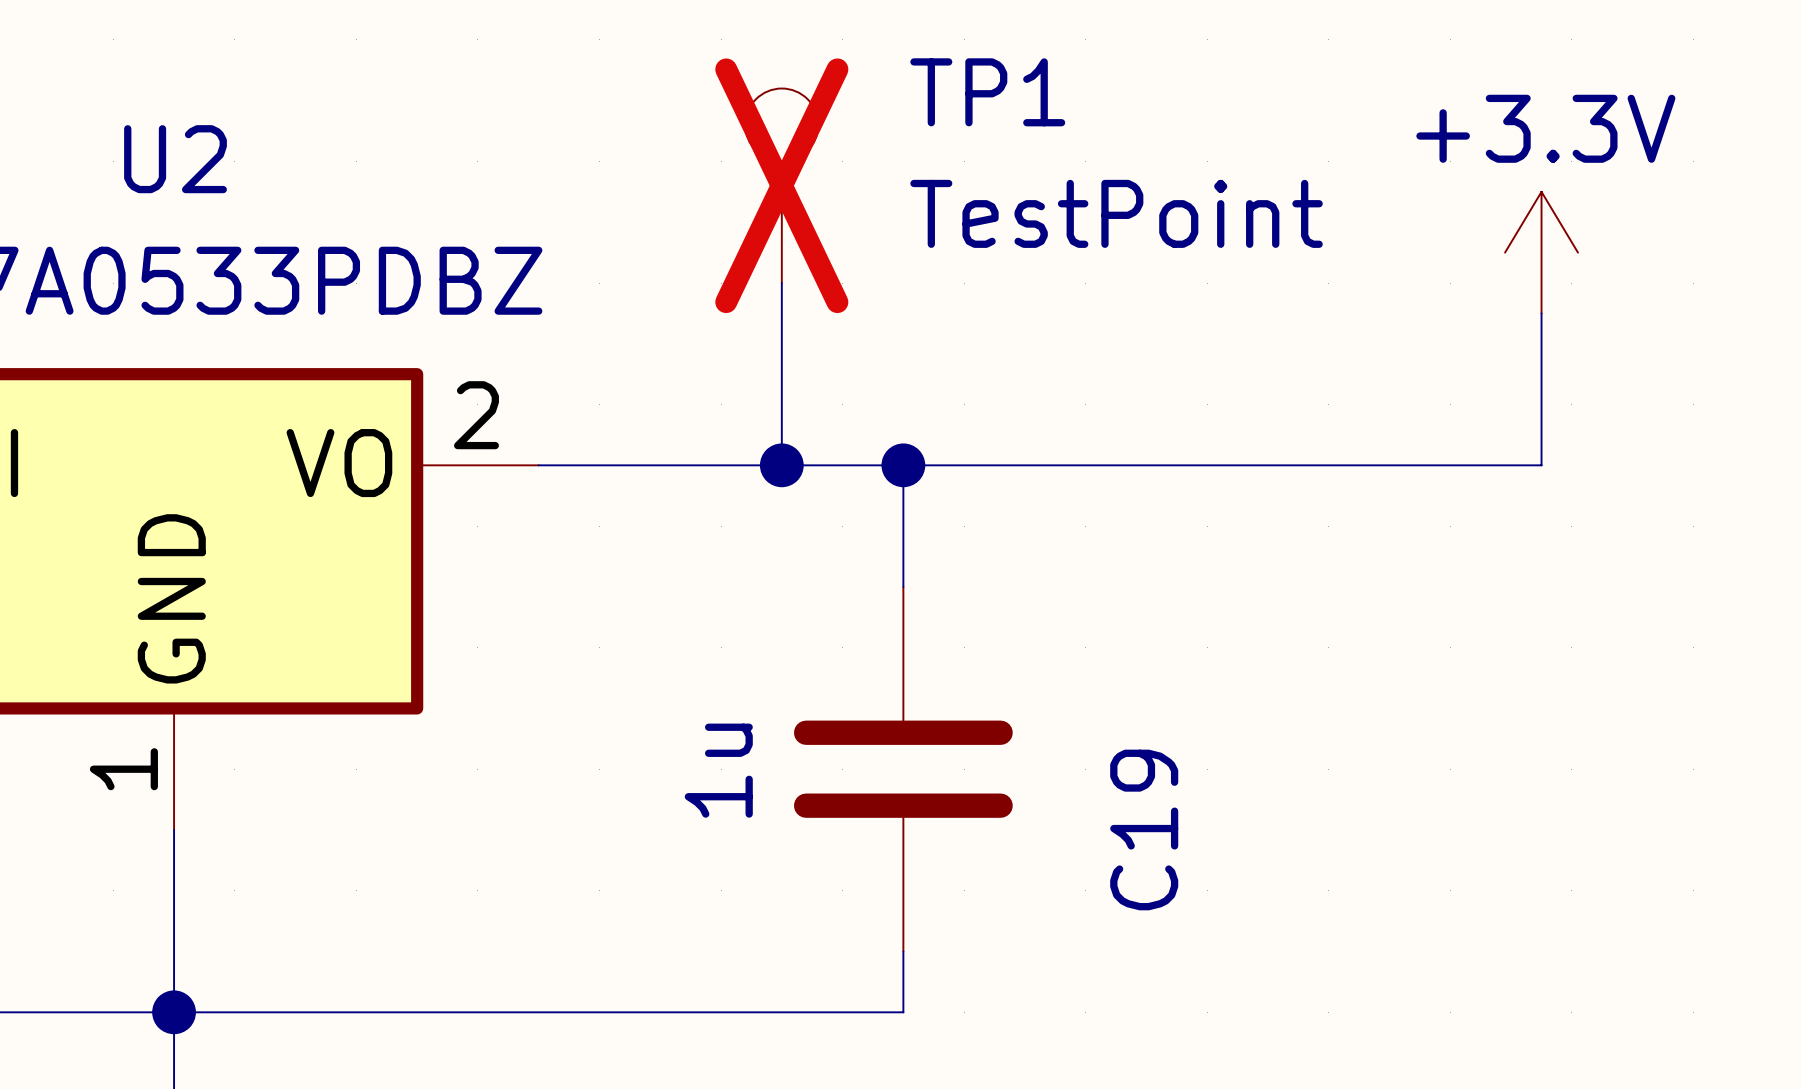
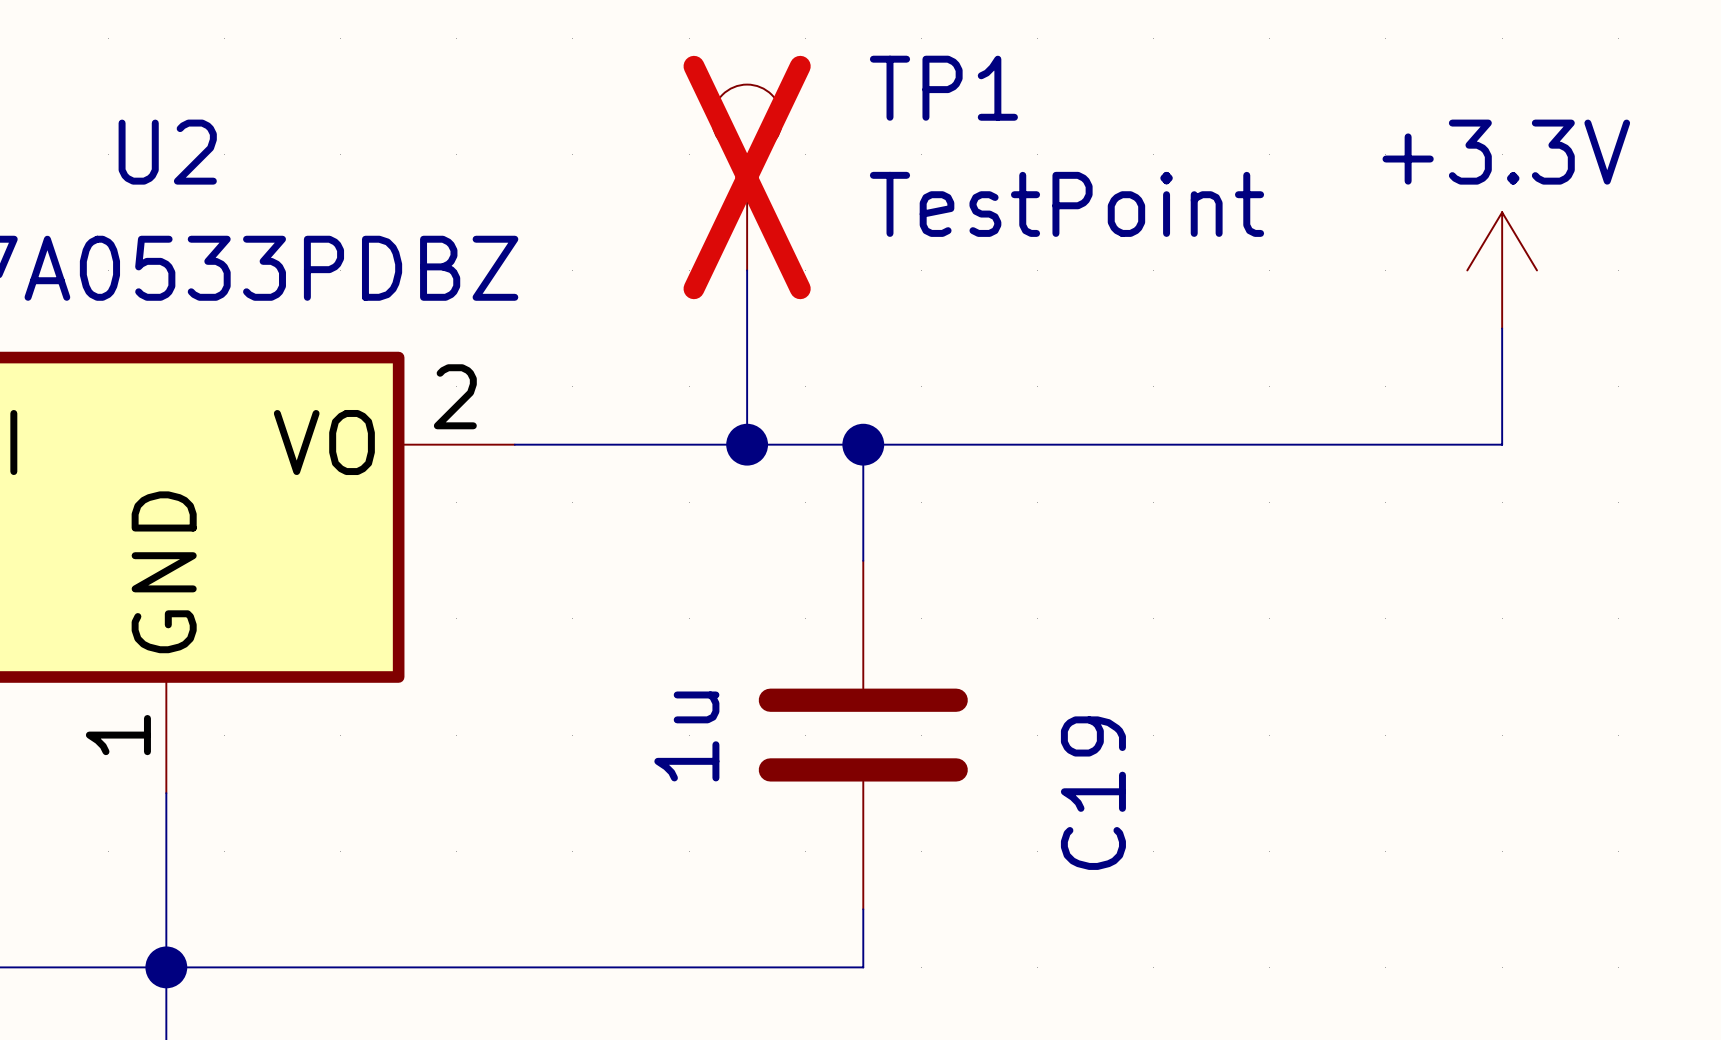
power symbol position: +3.3V (1541, 252) -> +3.3V (1502, 270)
wire: (1541, 313) (1541, 465) -> (1502, 328) (1502, 444) (1473, 444)

